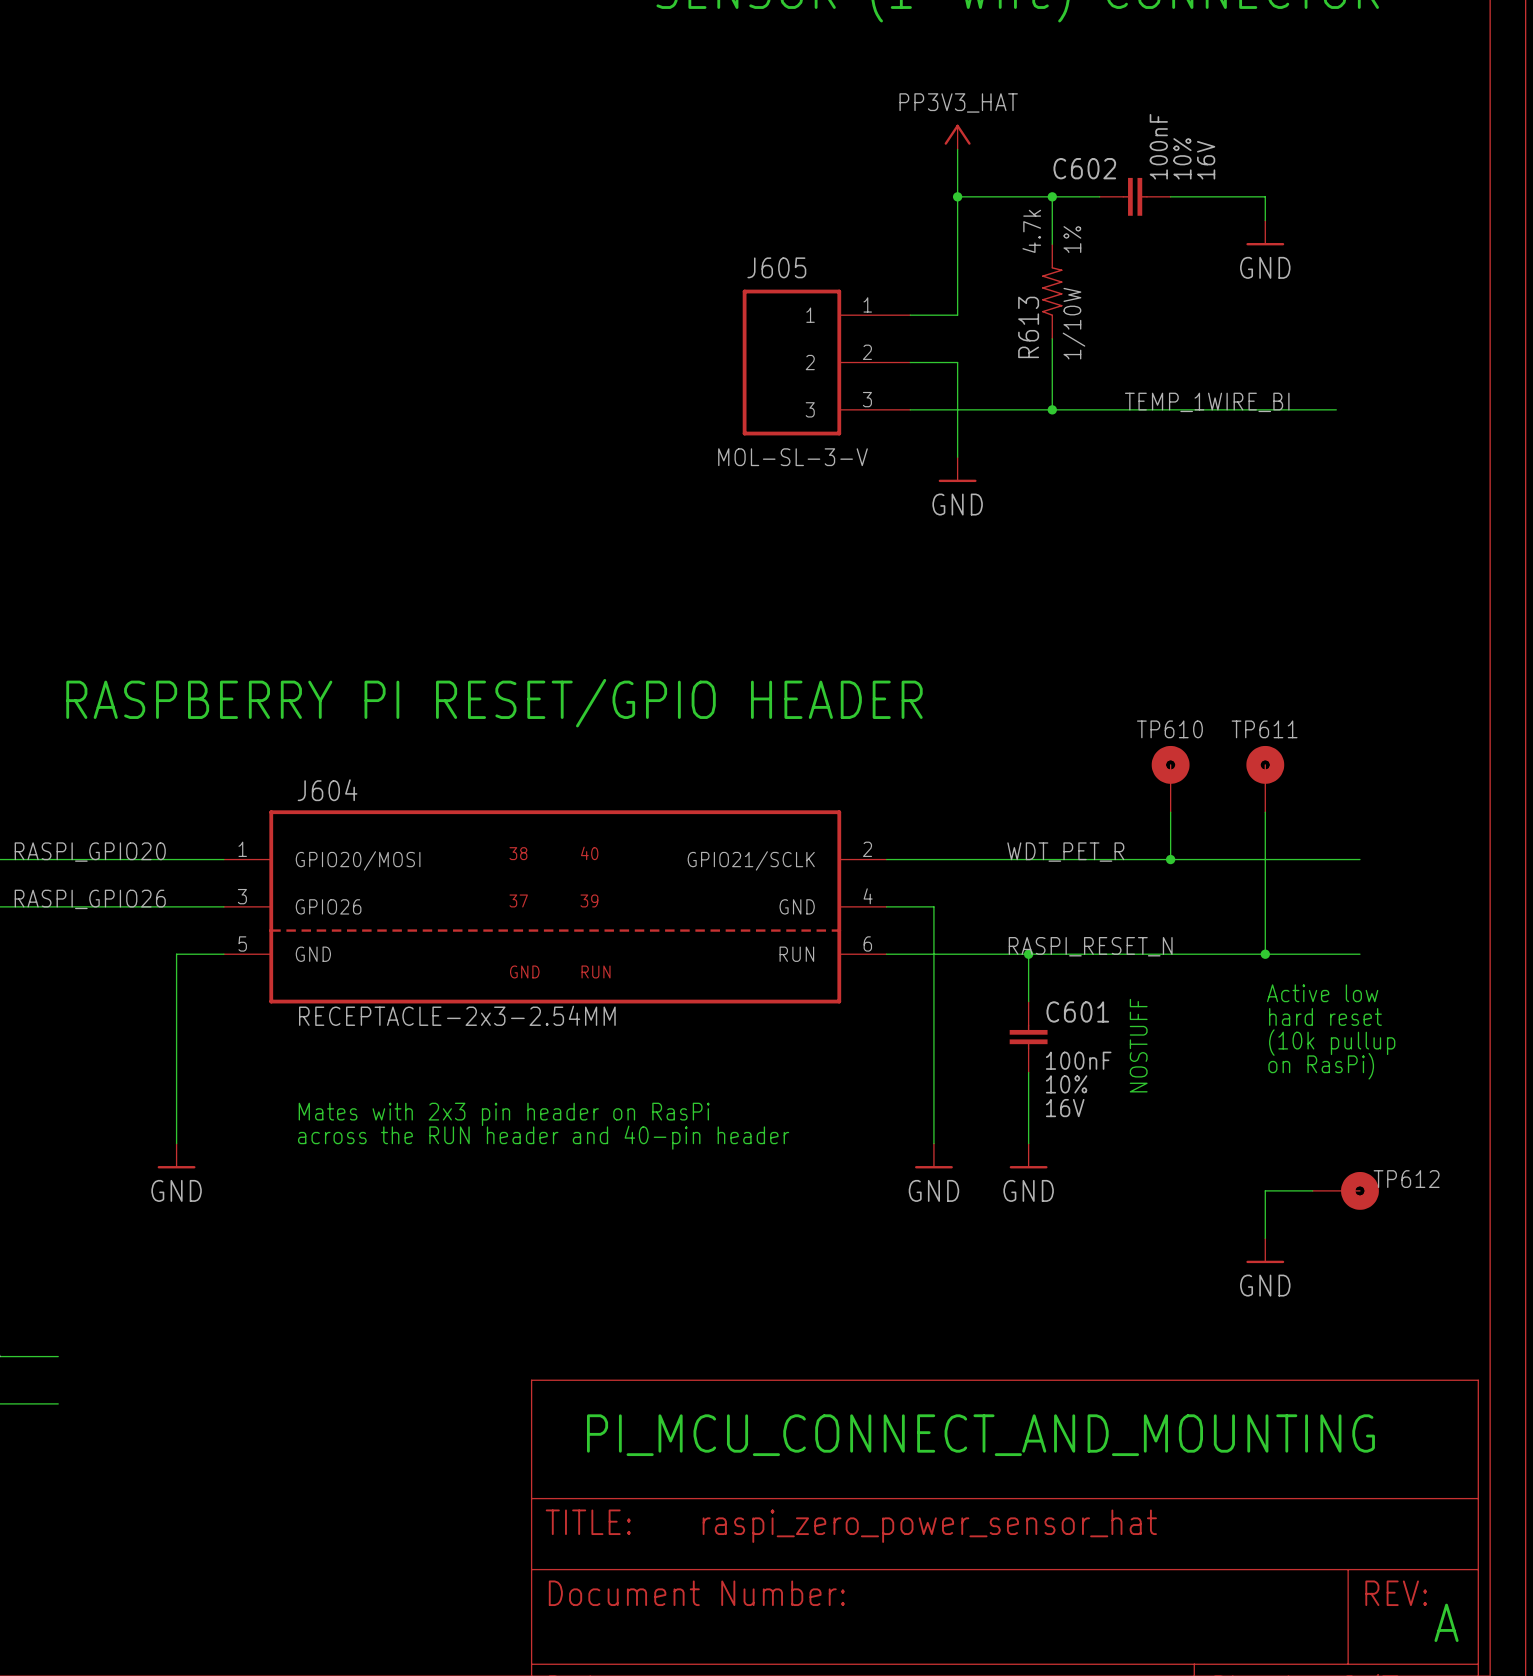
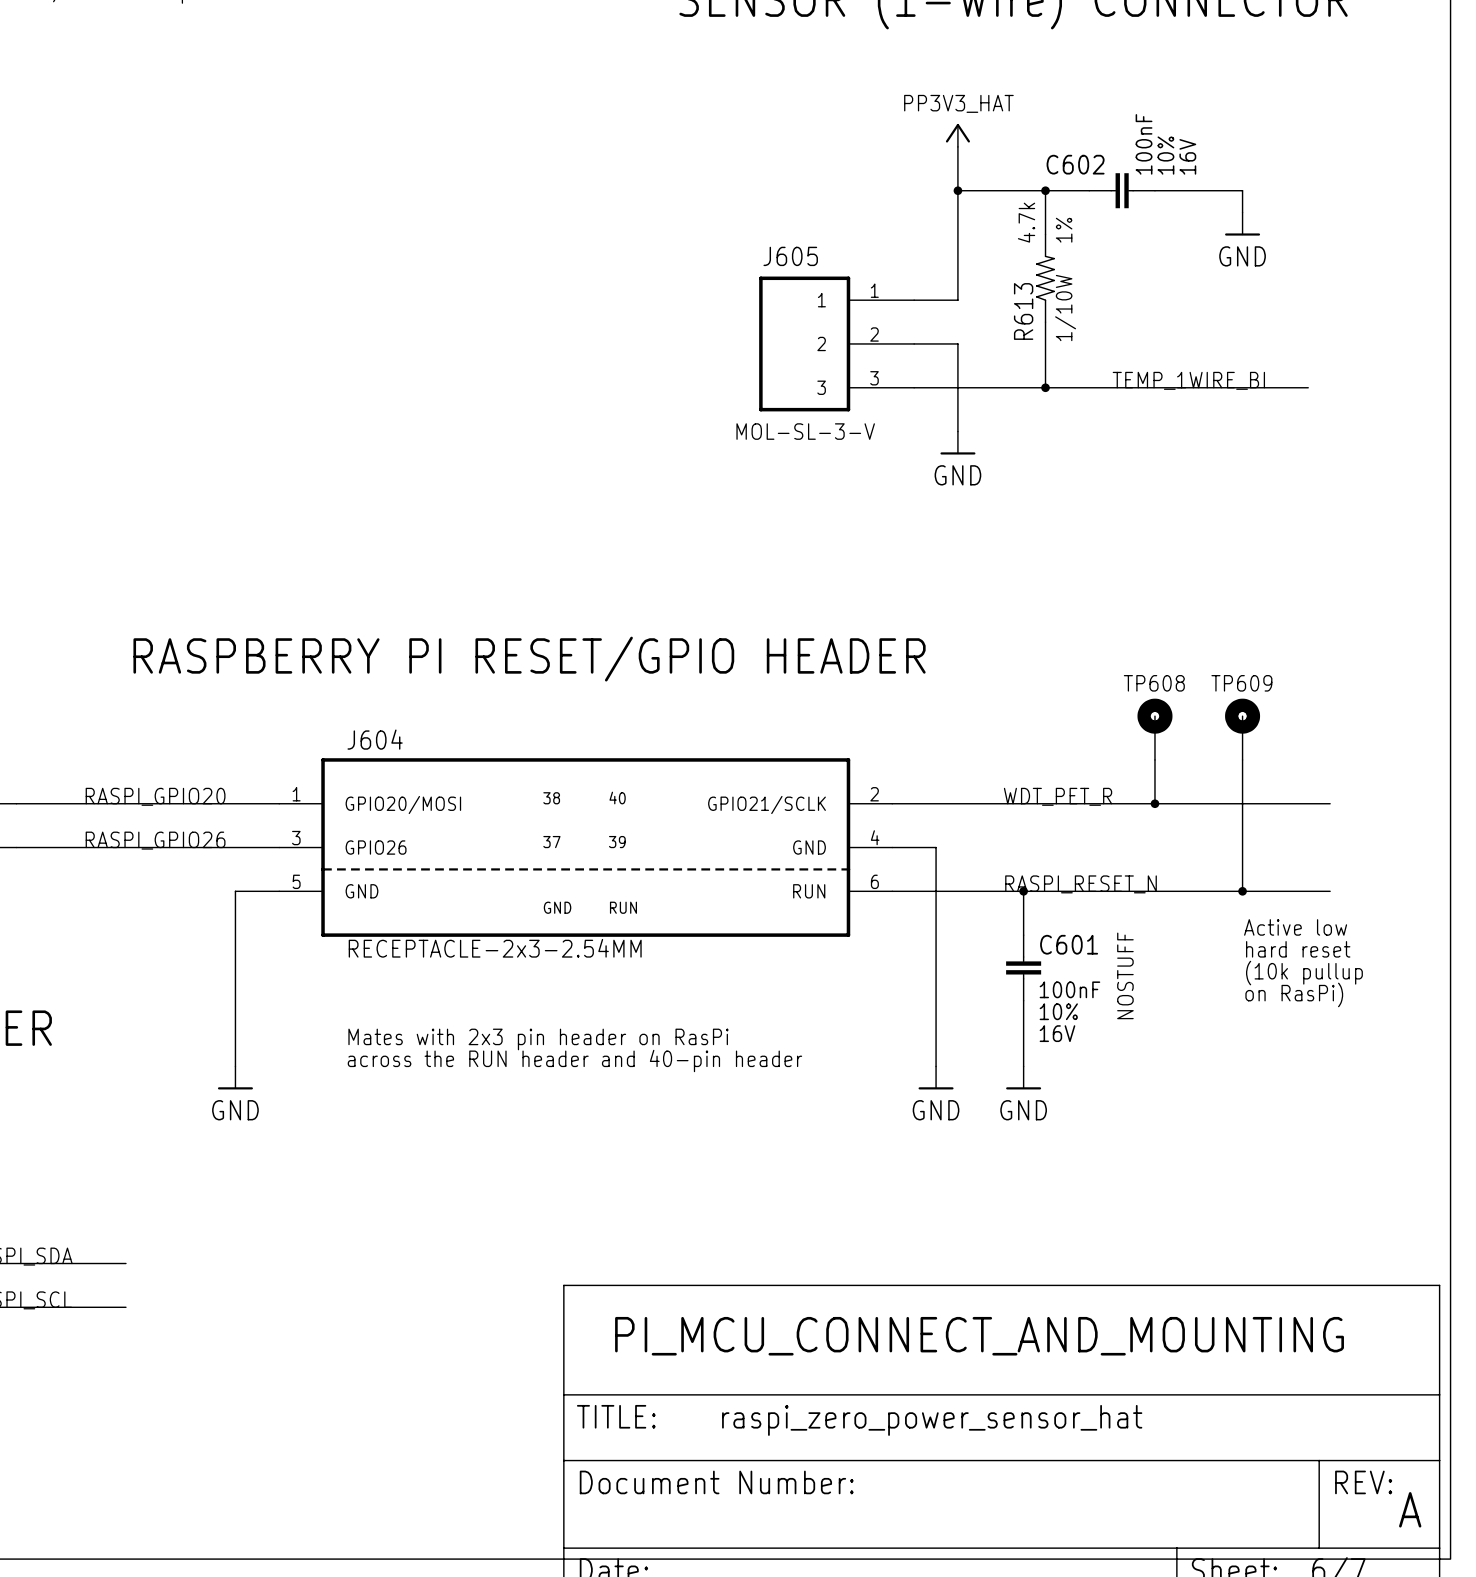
TP610 name: TP610 (1169, 729) -> TP608 (1154, 683)
TP611 name: TP611 (1264, 729) -> TP609 (1241, 683)
wire: (1312, 1190) (1265, 1190) (1265, 1238) -> none
TP612: (1345, 1190) -> none
power symbol: GND (1265, 1250) -> none

